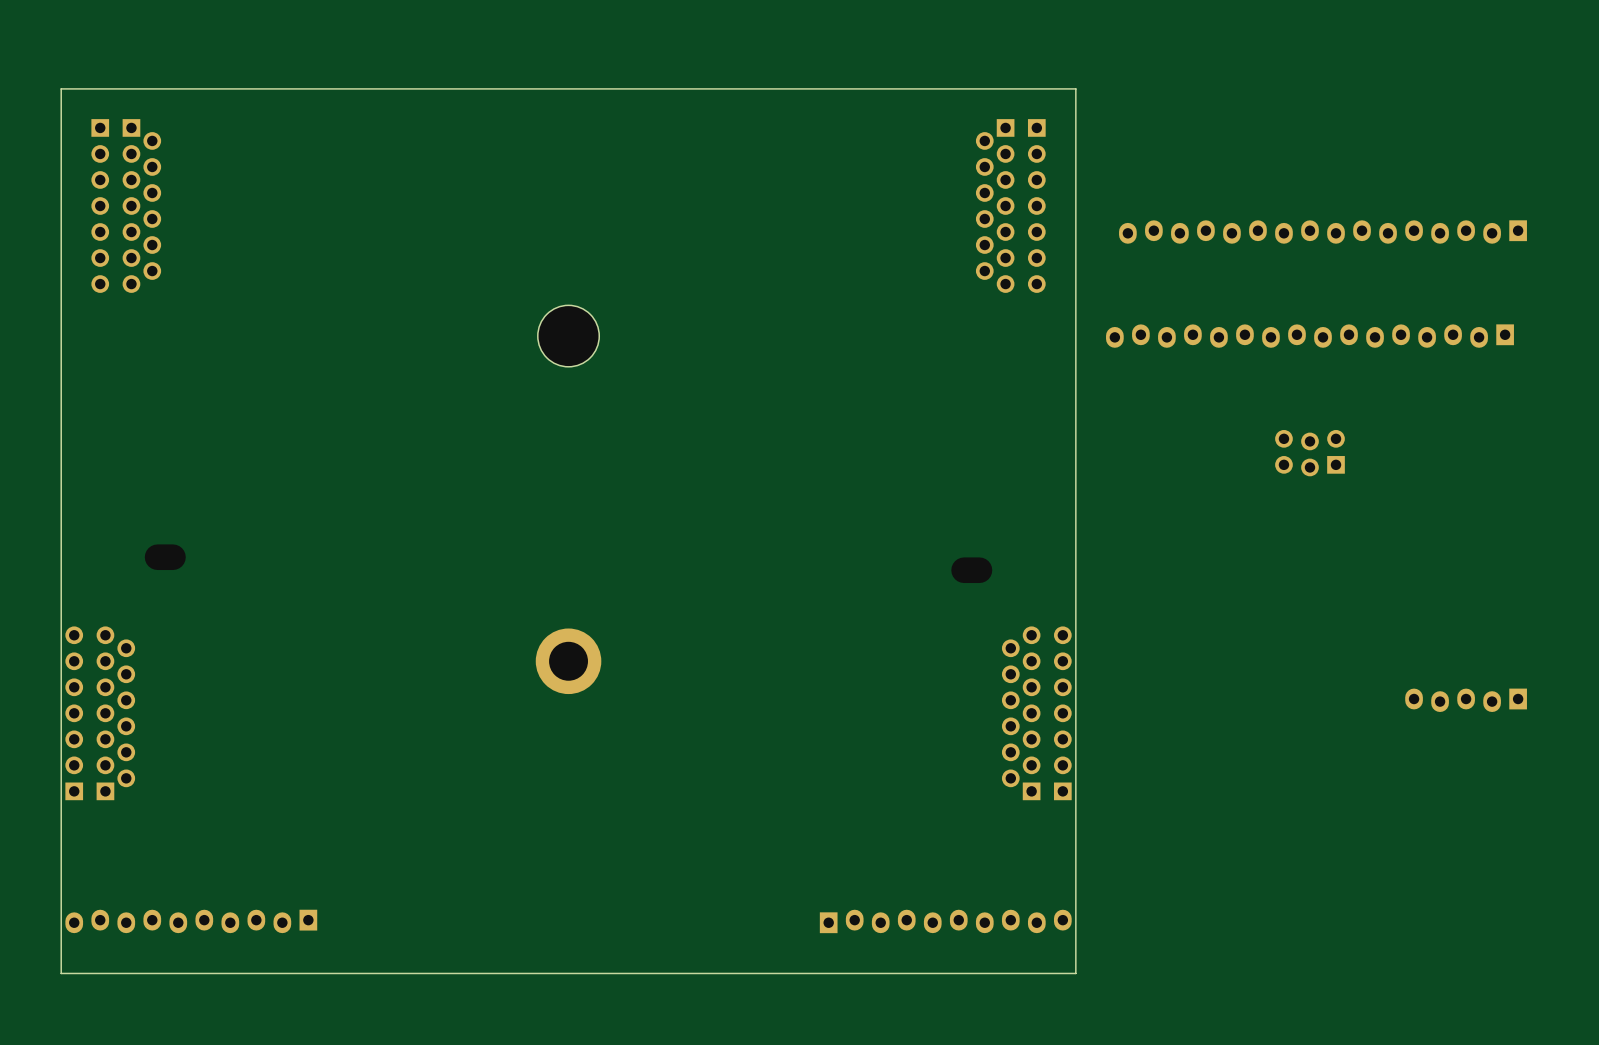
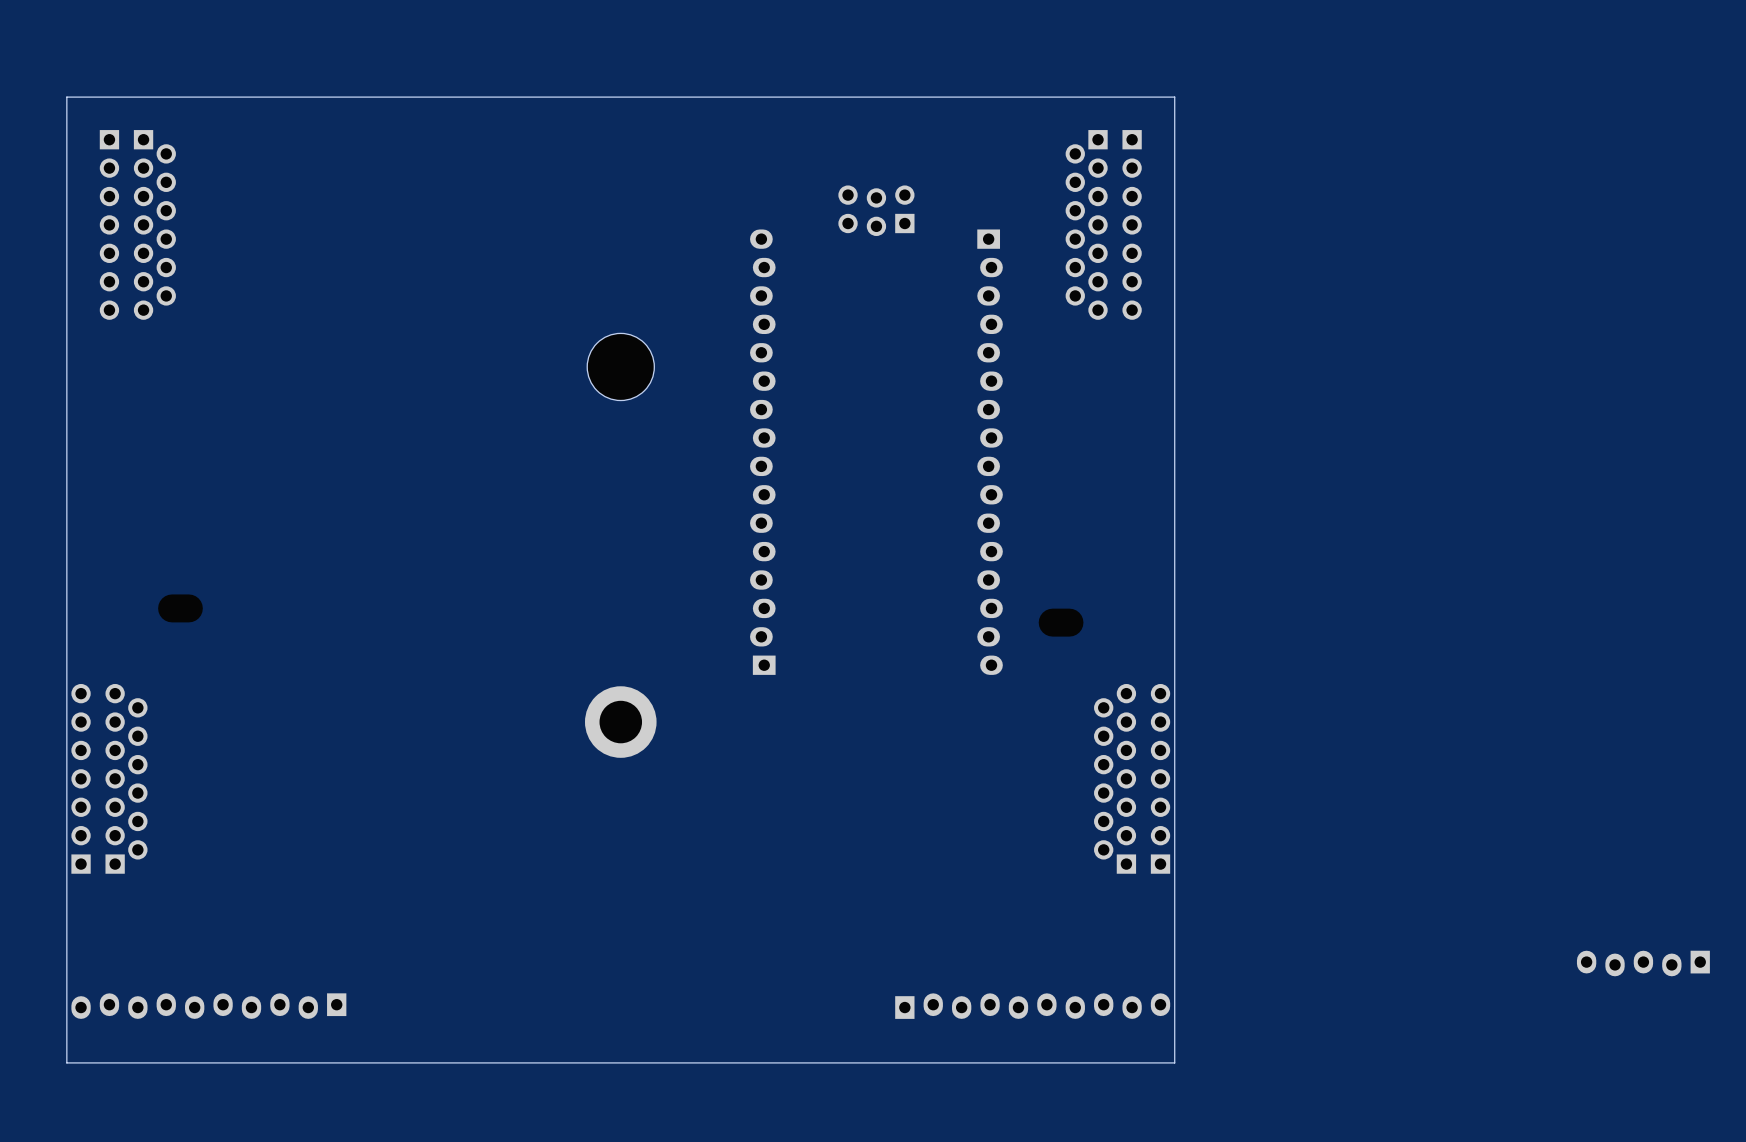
part: none -> (876, 210)
part: (1323, 232) -> none
part: (1309, 336) -> none
part: none -> (762, 452)
part: none -> (990, 452)
part: (1309, 453) -> none
part position: (1466, 700) -> (1643, 963)

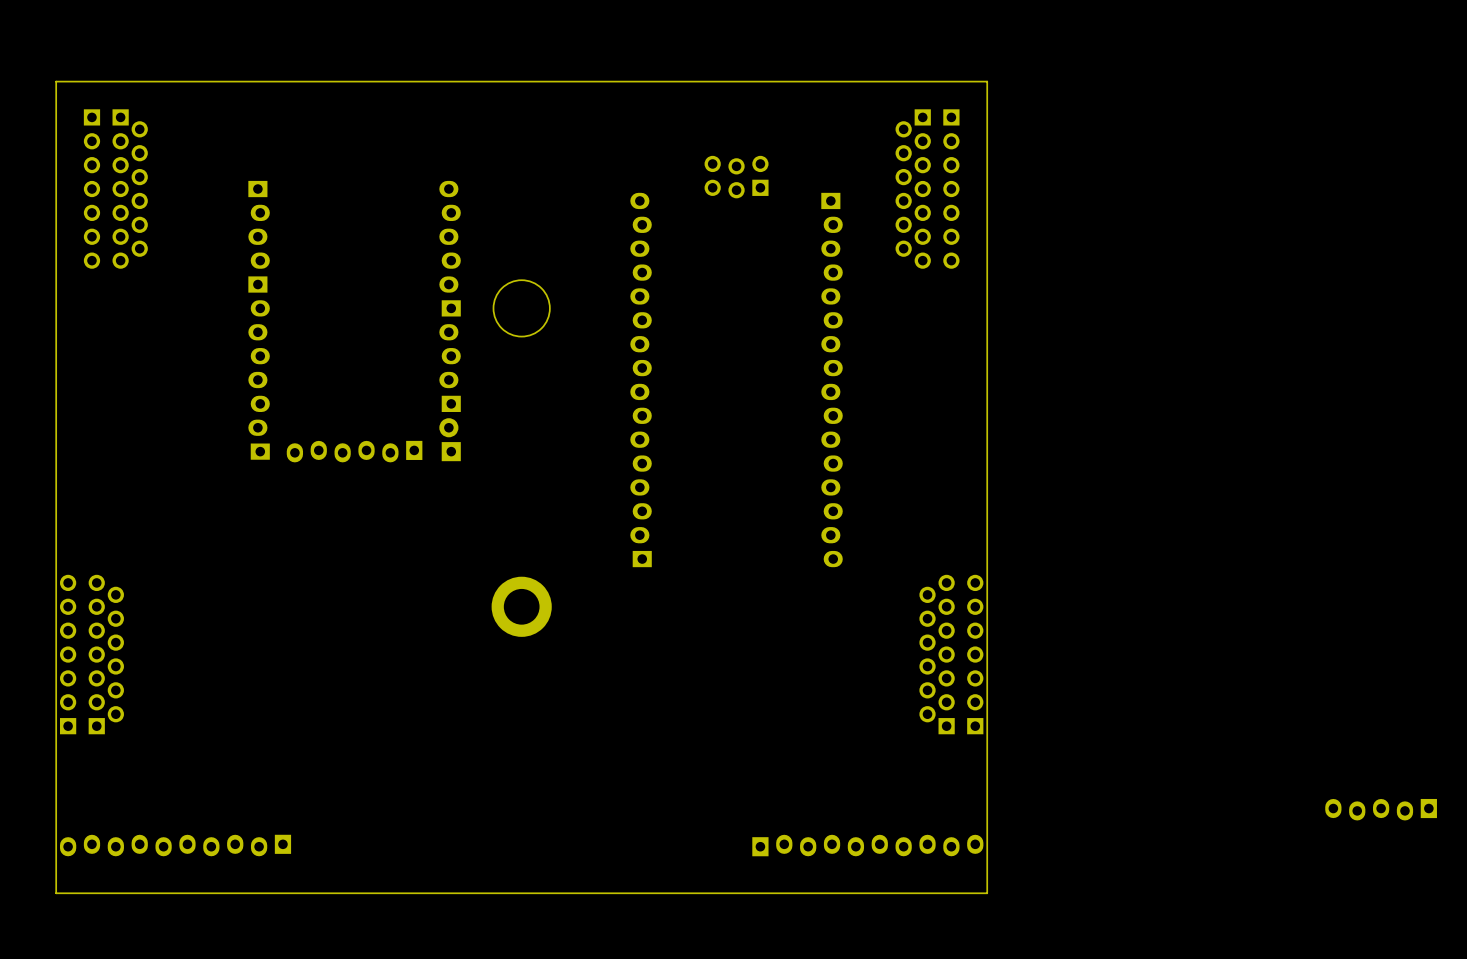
part: none -> (259, 224)
part: none -> (450, 248)
part: none -> (259, 320)
part: none -> (450, 368)
part: none -> (259, 415)
part: none -> (450, 439)
part: none -> (354, 451)

